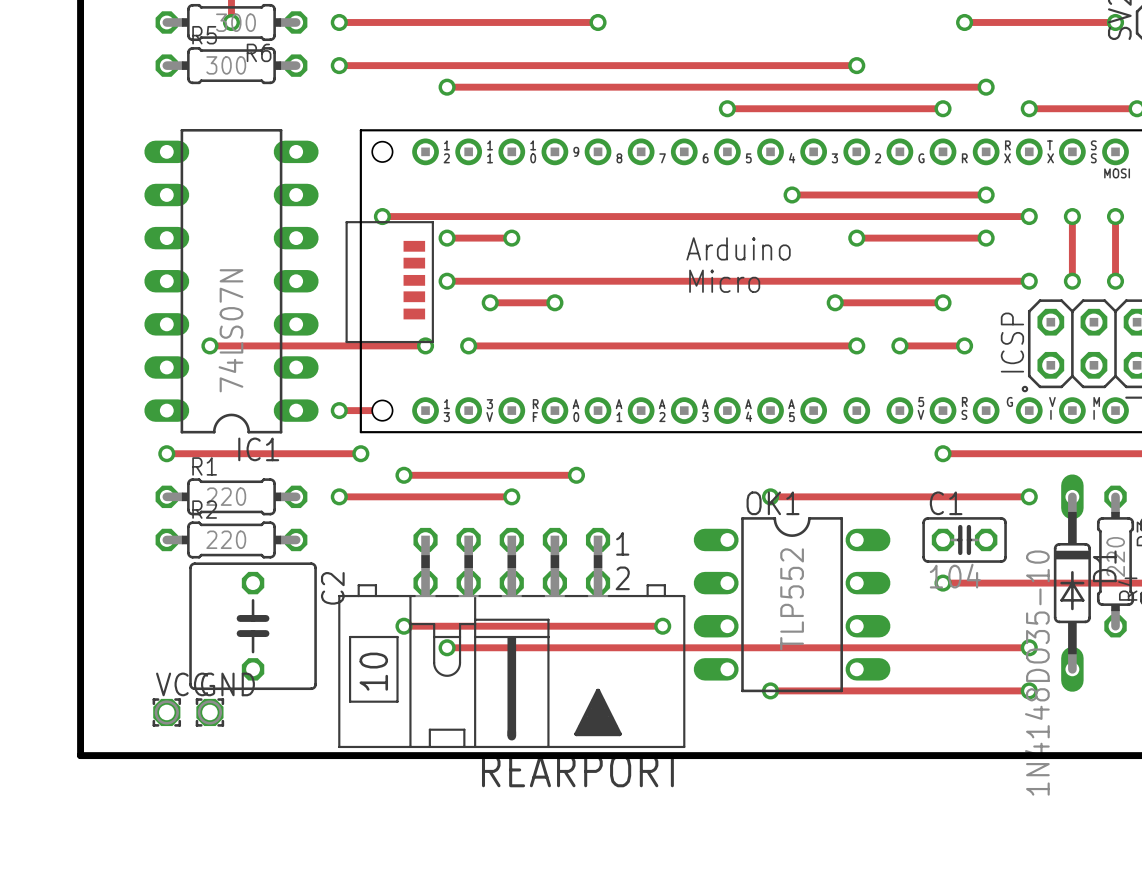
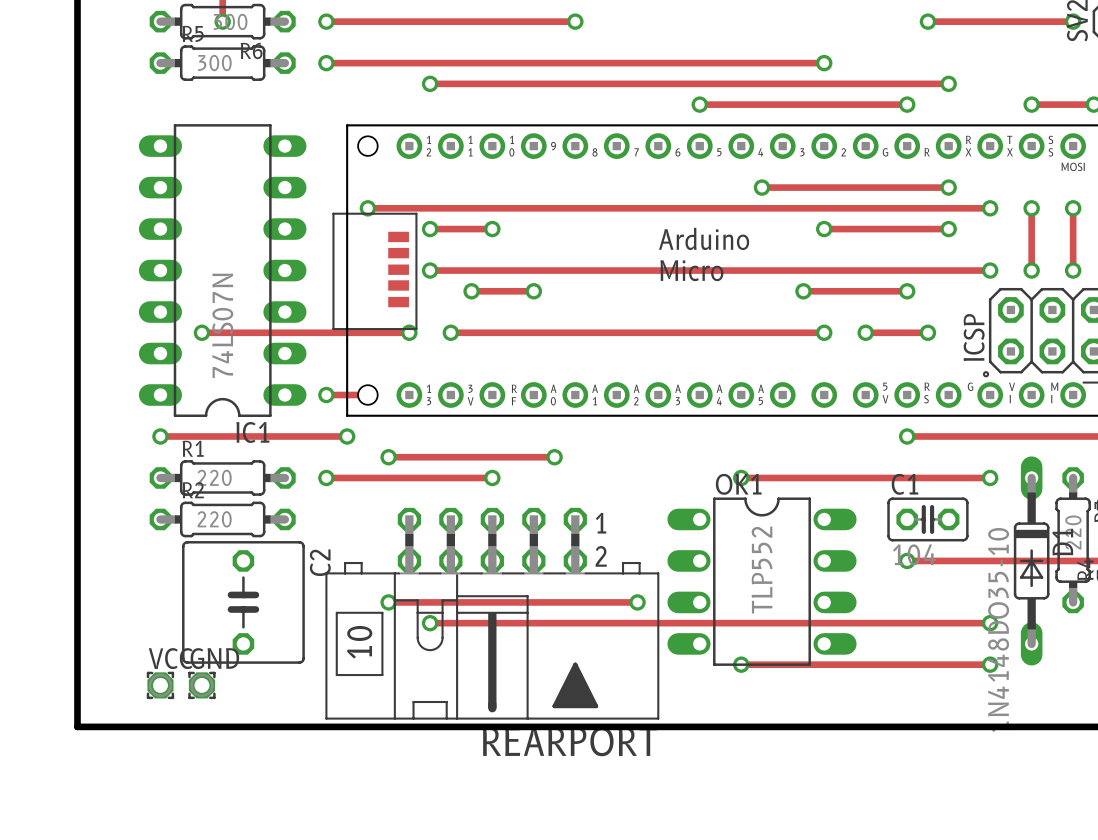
track: (1029, 108) (1072, 108) -> none
via position: (1029, 108) -> (1031, 104)

